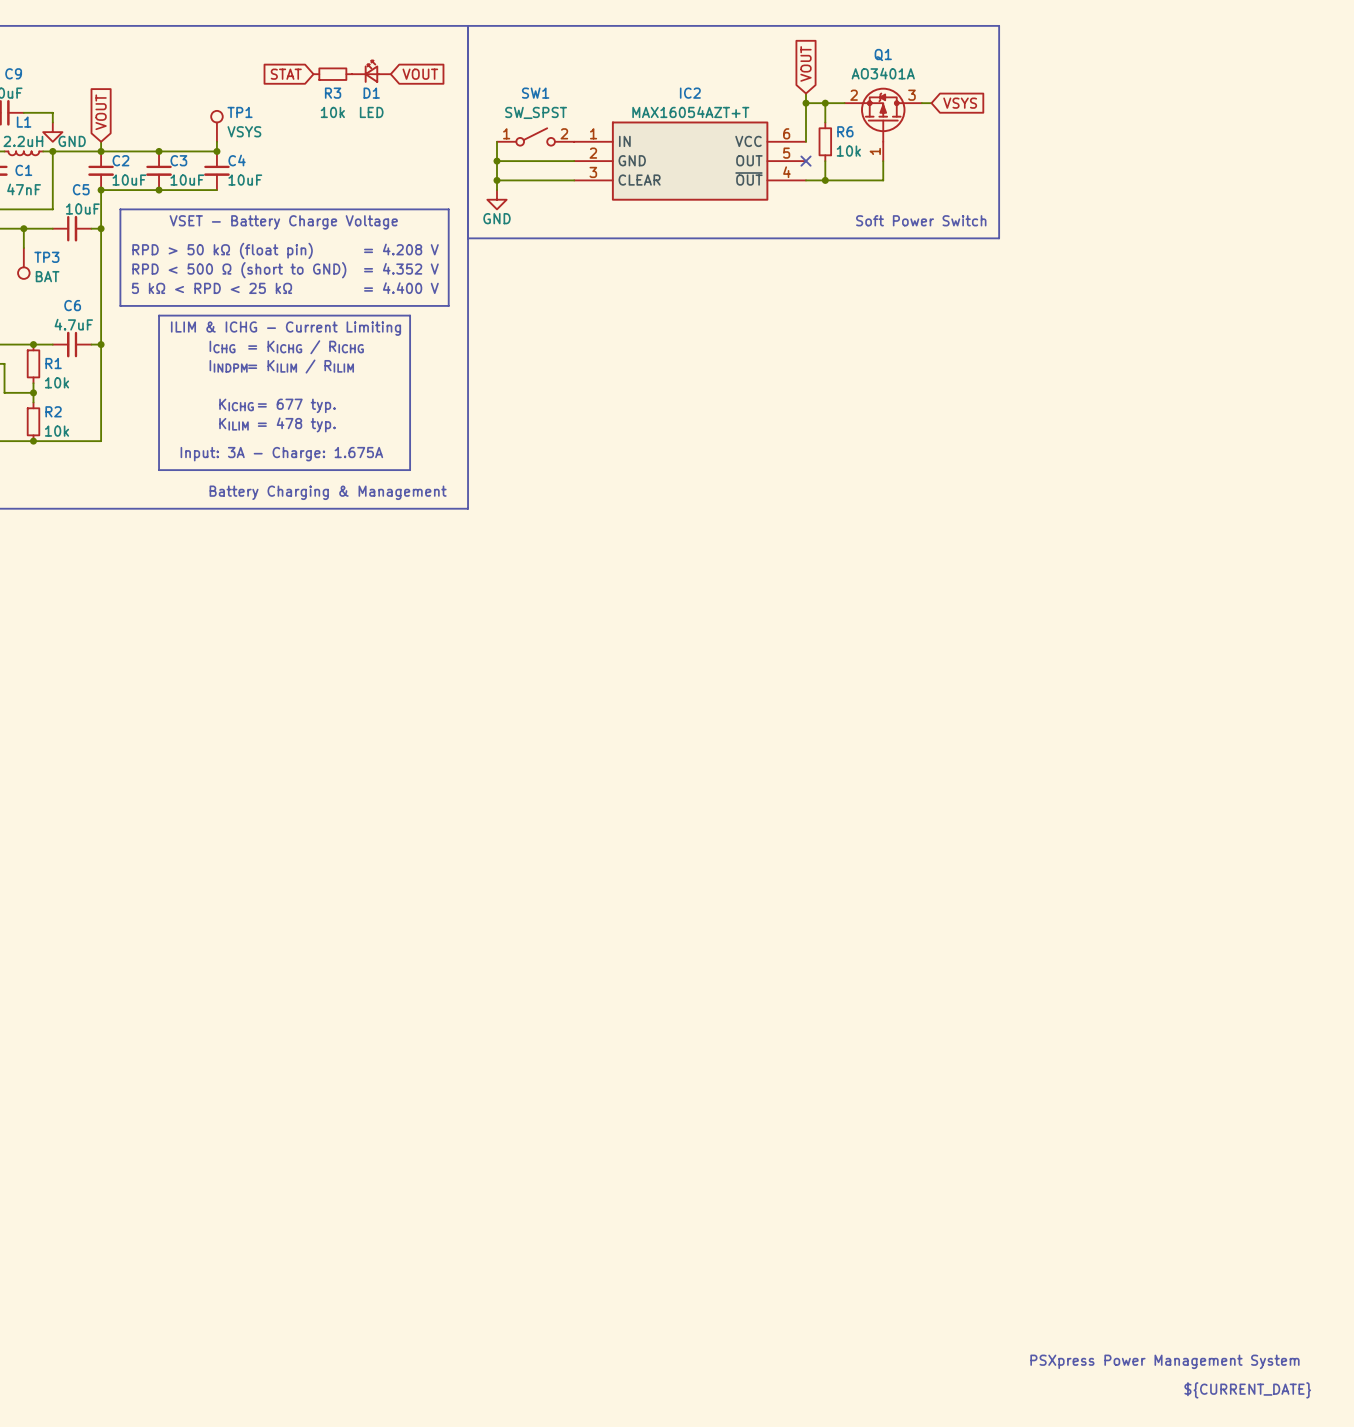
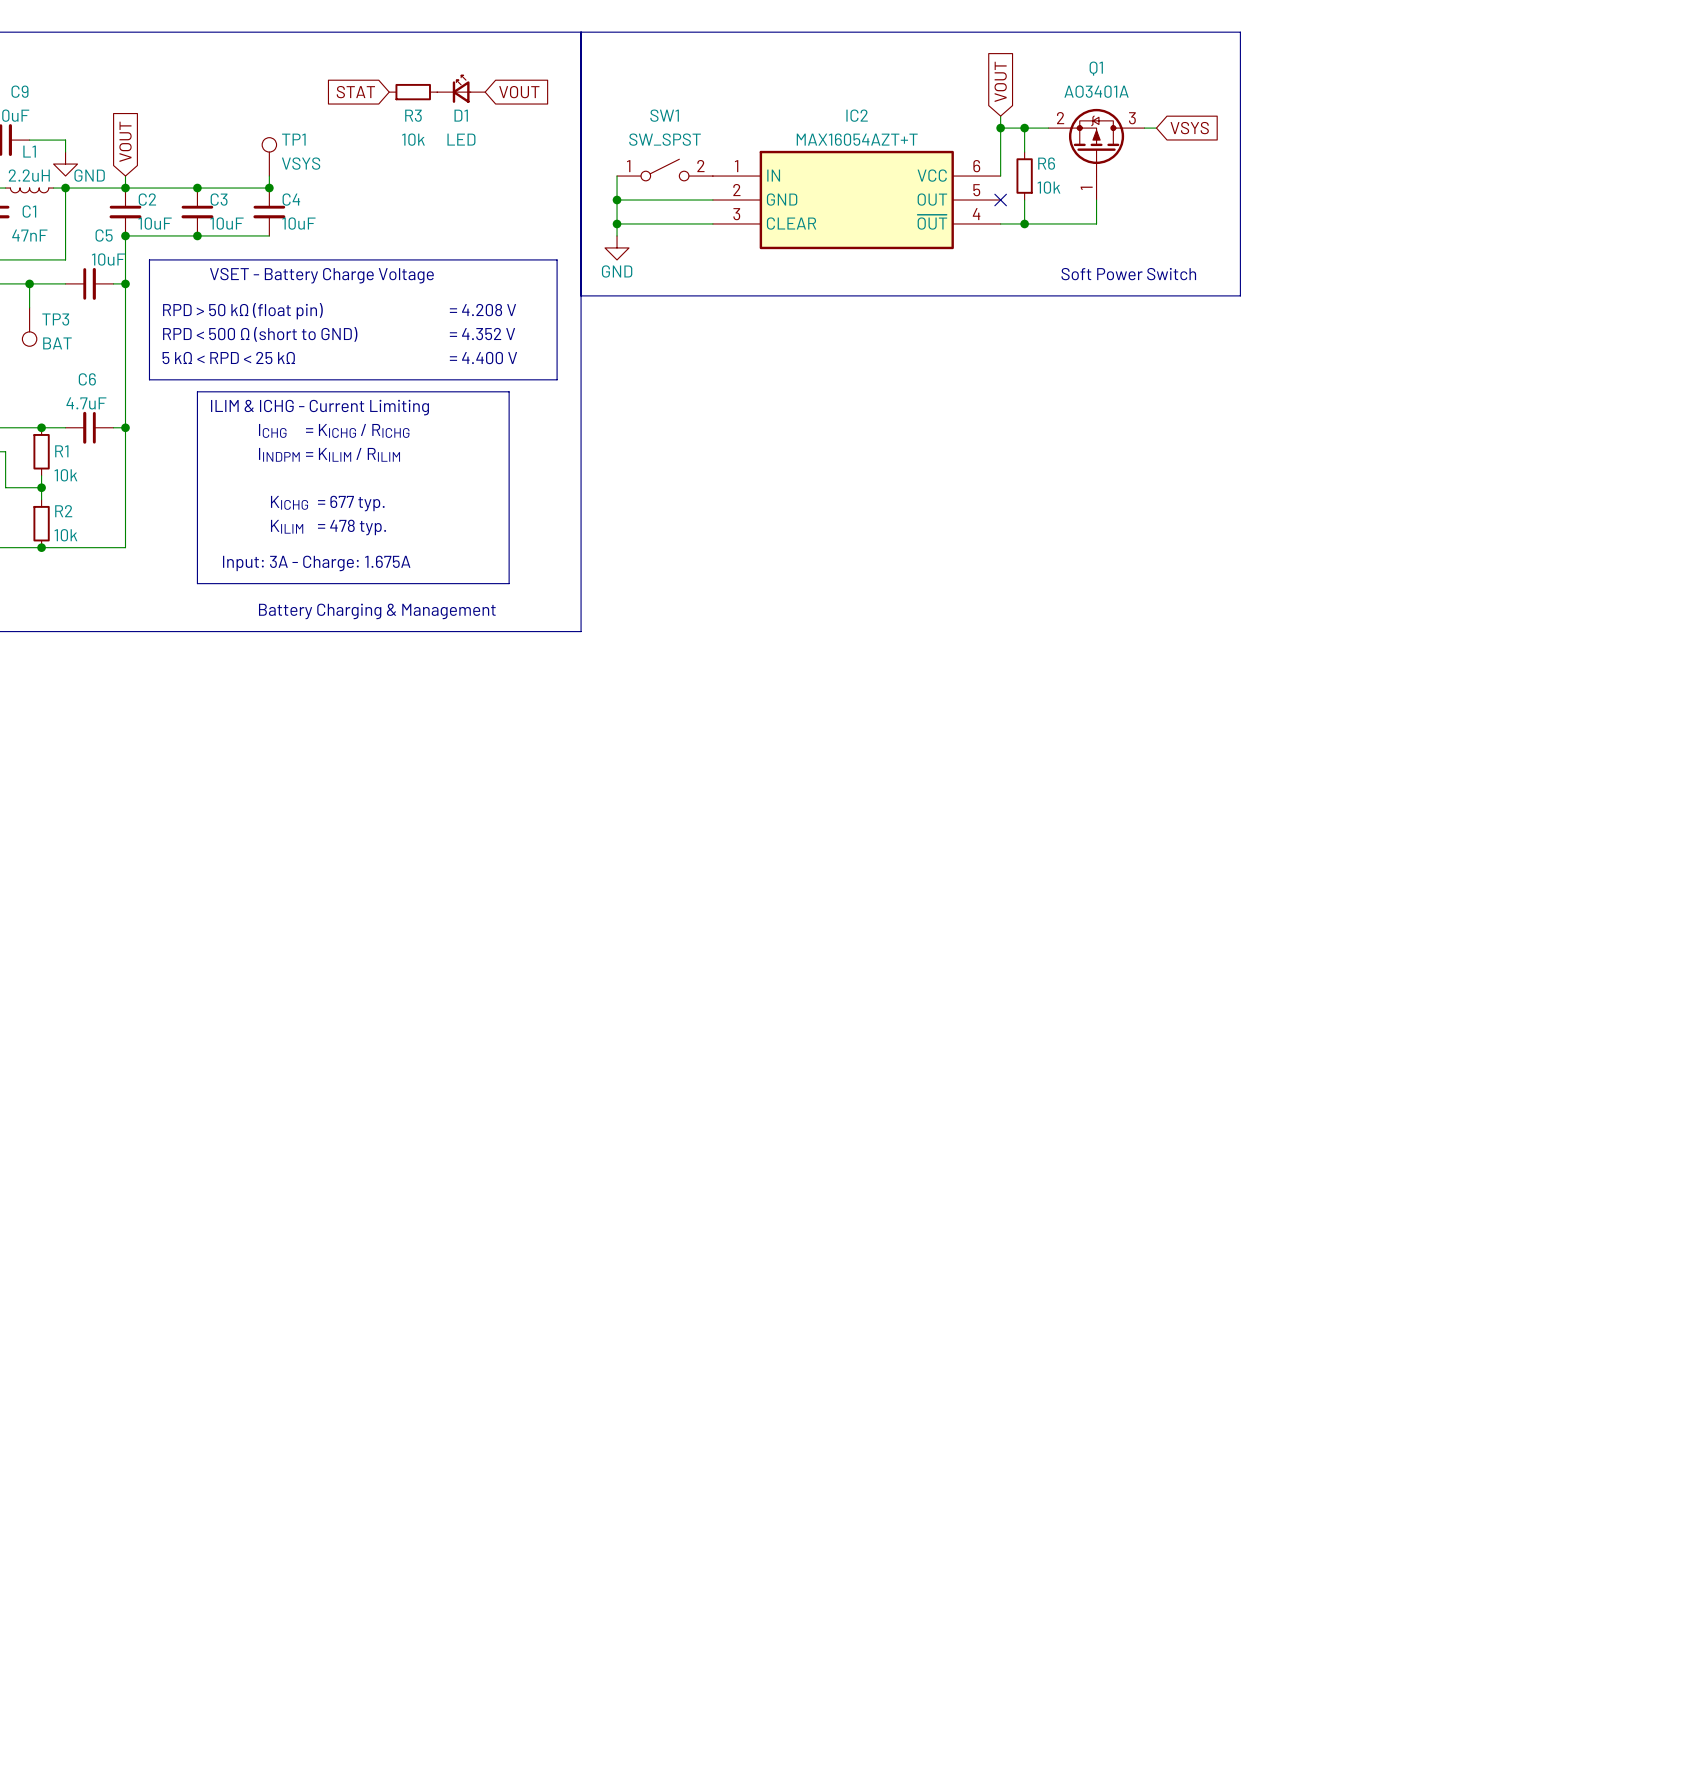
text: PSXpress Power Management System (1164, 1361) -> none
text: ${CURRENT_DATE} (1247, 1390) -> none

